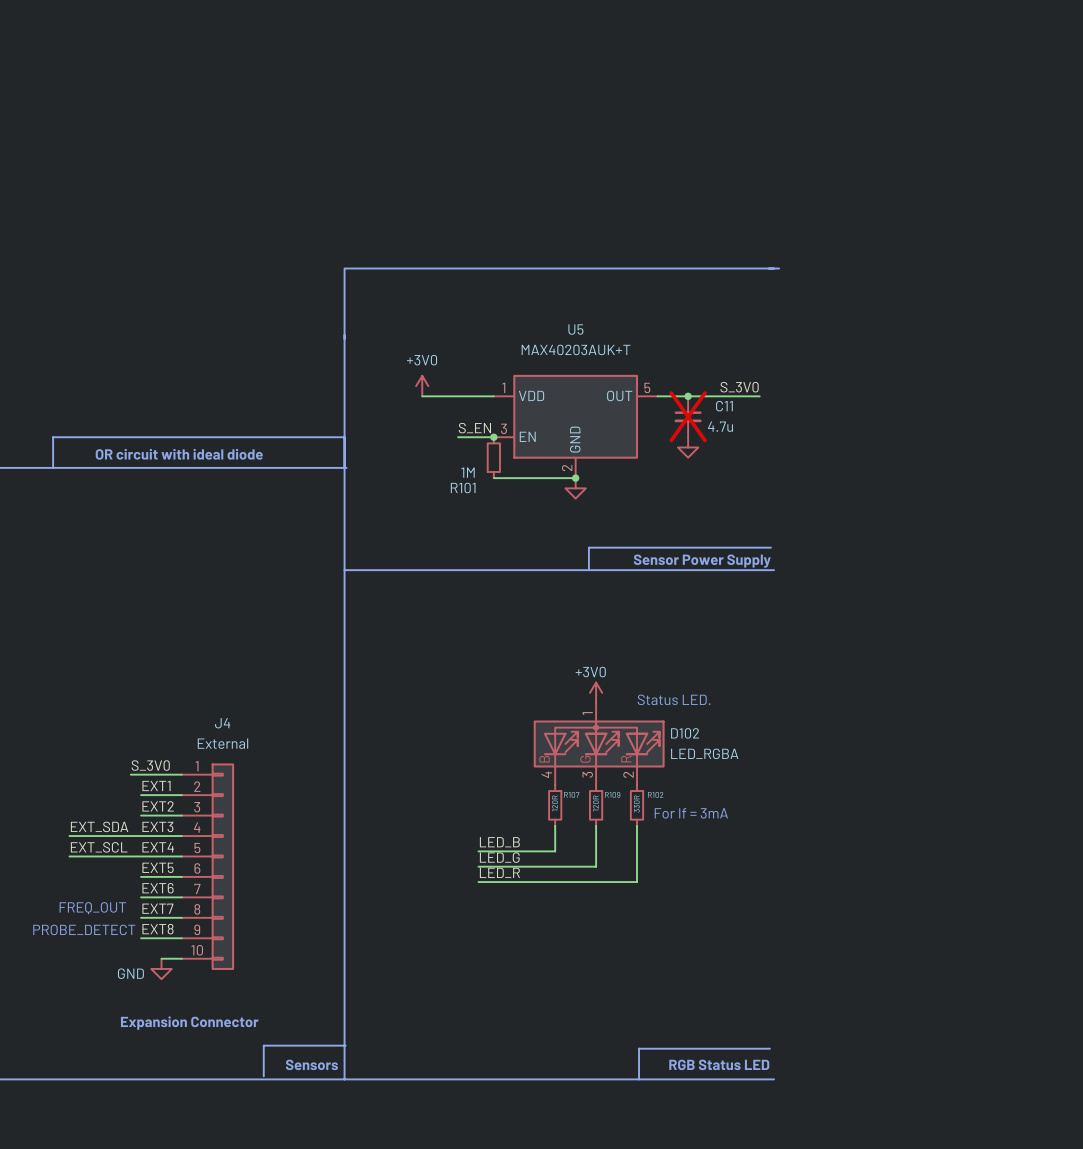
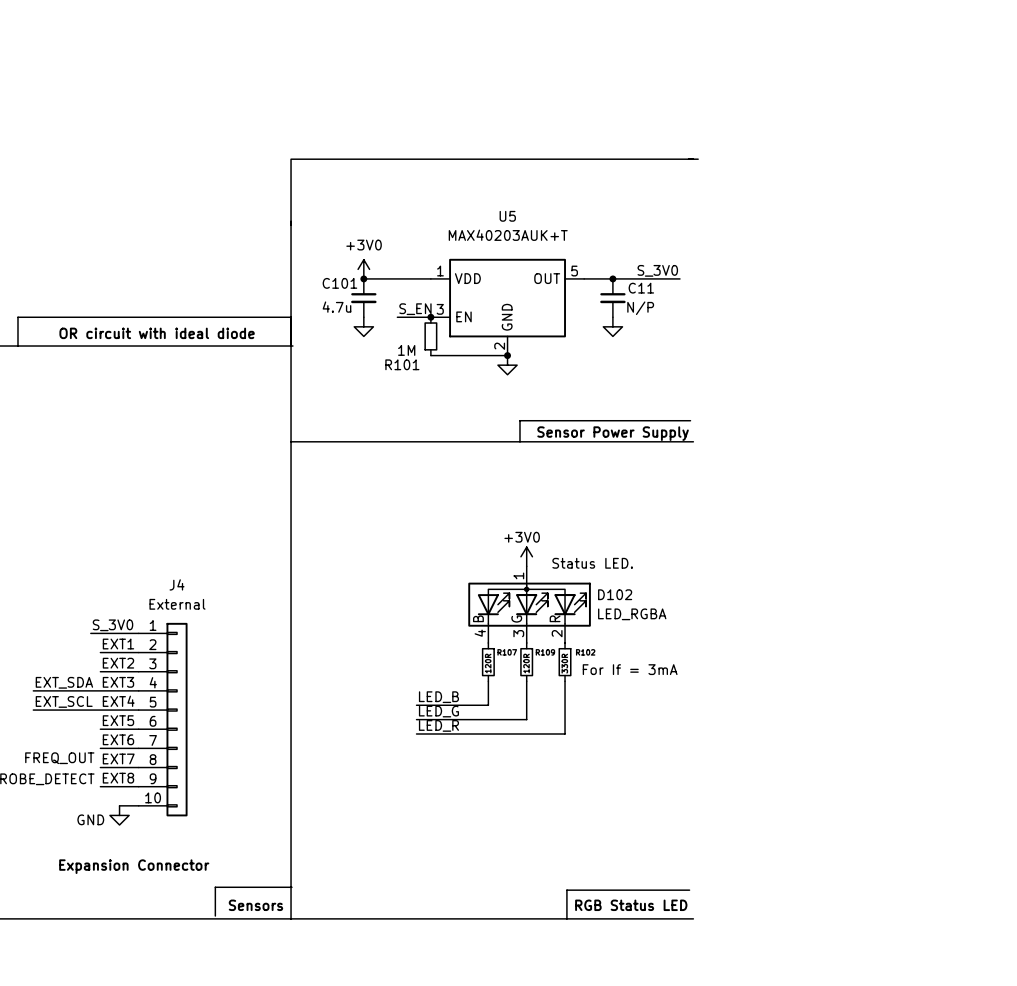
junction: none -> (363, 278)
C101: none -> 4.7u (363, 298)
C11 do-not-place cross: (688, 416) -> none
C11 value: 4.7u (720, 426) -> N/P (640, 308)
power symbol: none -> (363, 326)

